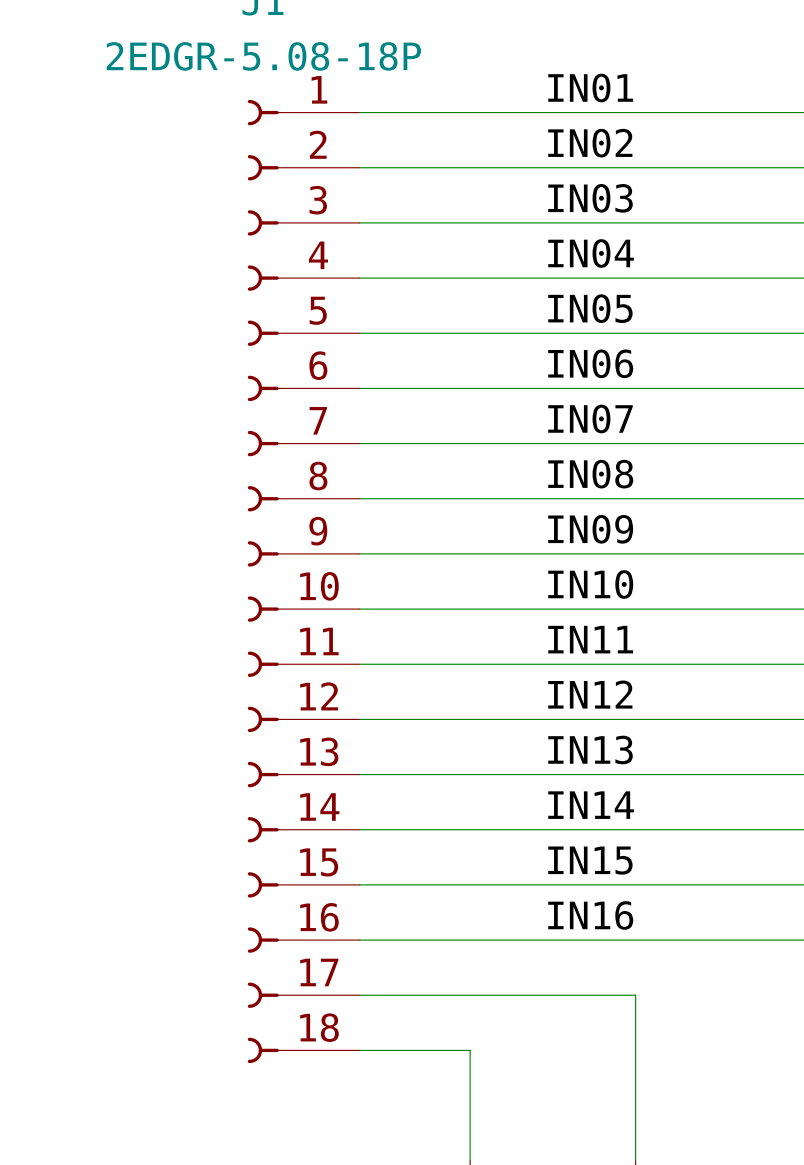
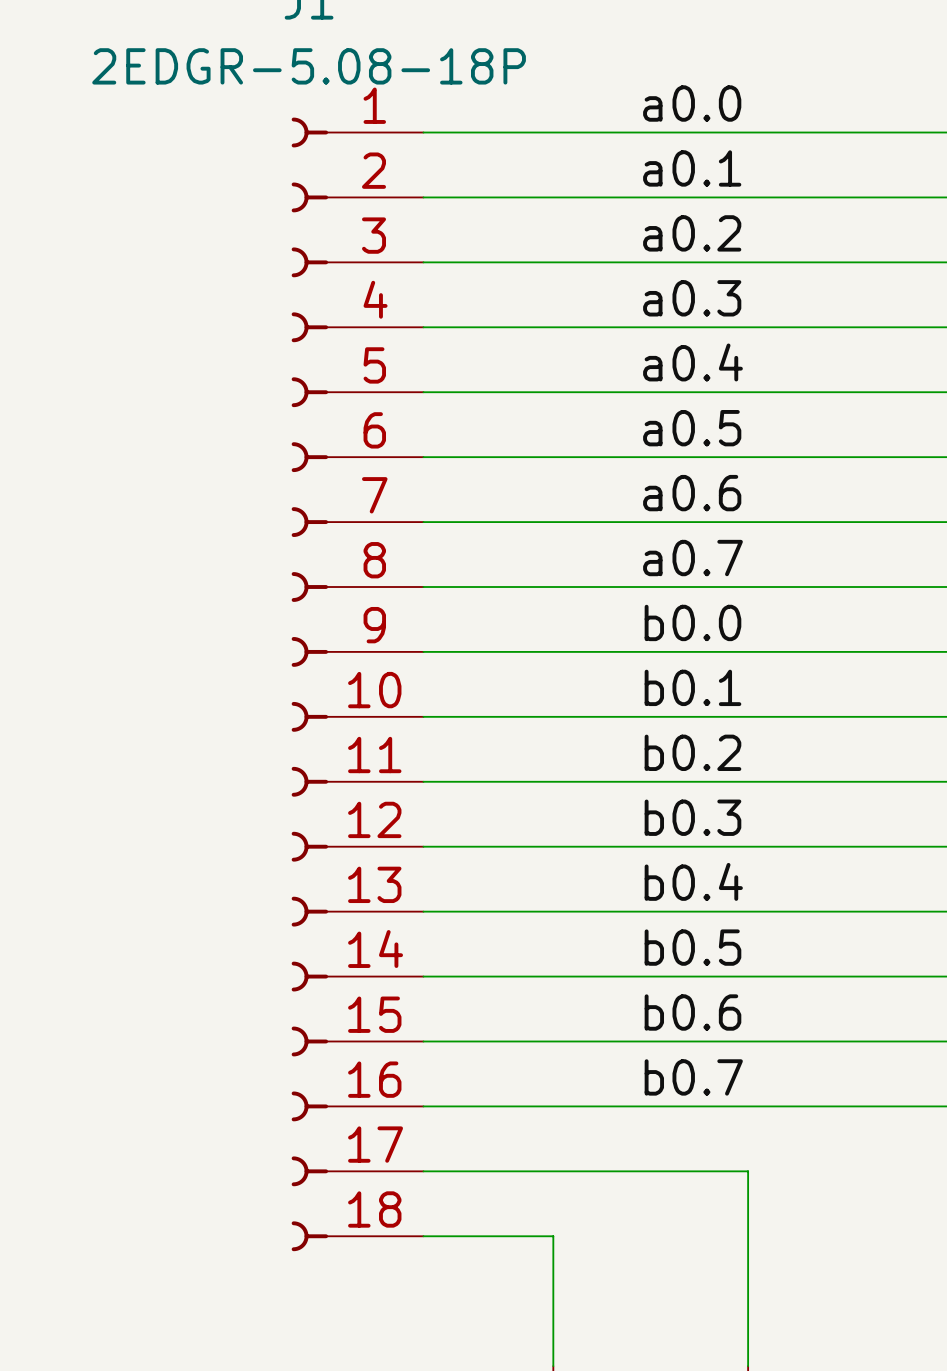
label: IN01 (590, 87) -> a0.0 (692, 103)
label: IN02 (590, 143) -> a0.1 (692, 168)
label: IN03 (590, 198) -> a0.2 (692, 233)
label: IN04 (591, 253) -> a0.3 (692, 298)
label: IN05 (590, 308) -> a0.4 (692, 362)
label: IN06 (590, 363) -> a0.5 (692, 428)
label: IN07 (590, 418) -> a0.6 (692, 493)
label: IN08 (590, 474) -> a0.7 (692, 558)
label: IN09 (590, 529) -> b0.0 (692, 622)
label: IN10 (590, 584) -> b0.1 (692, 687)
label: IN11 (590, 639) -> b0.2 (692, 752)
label: IN12 (590, 694) -> b0.3 (692, 817)
label: IN13 (590, 749) -> b0.4 (693, 881)
label: IN14 (591, 805) -> b0.5 (692, 947)
label: IN15 (590, 860) -> b0.6 (692, 1012)
label: IN16 (590, 915) -> b0.7 (693, 1077)

